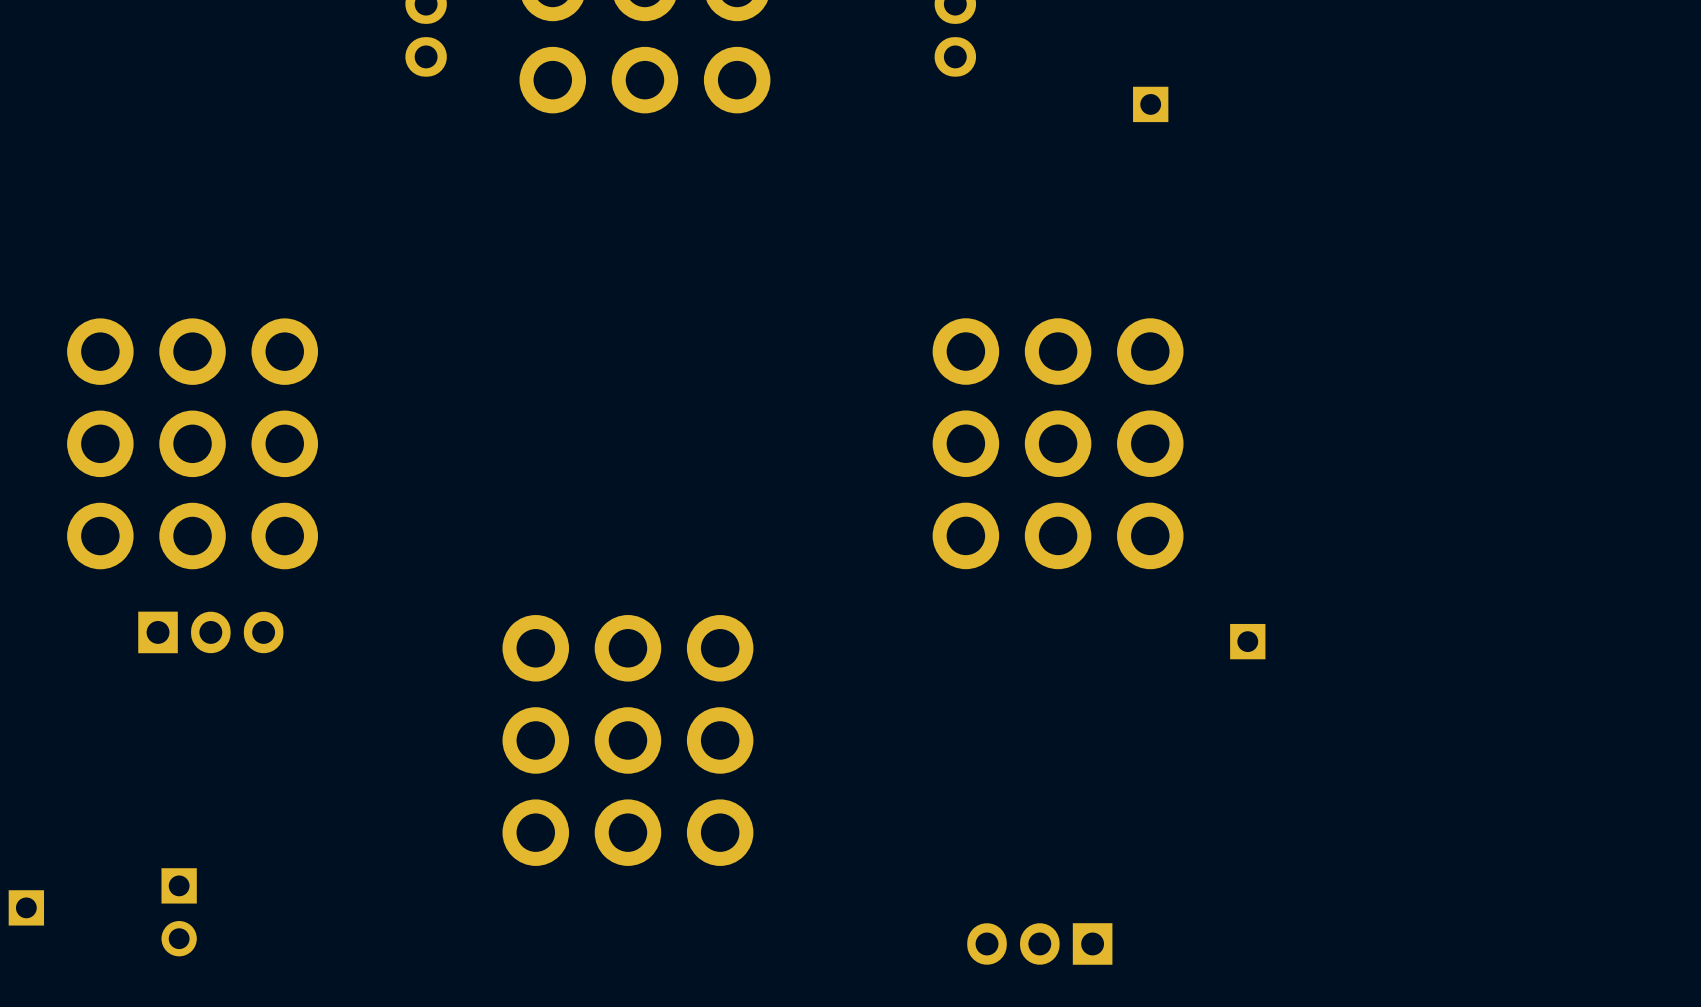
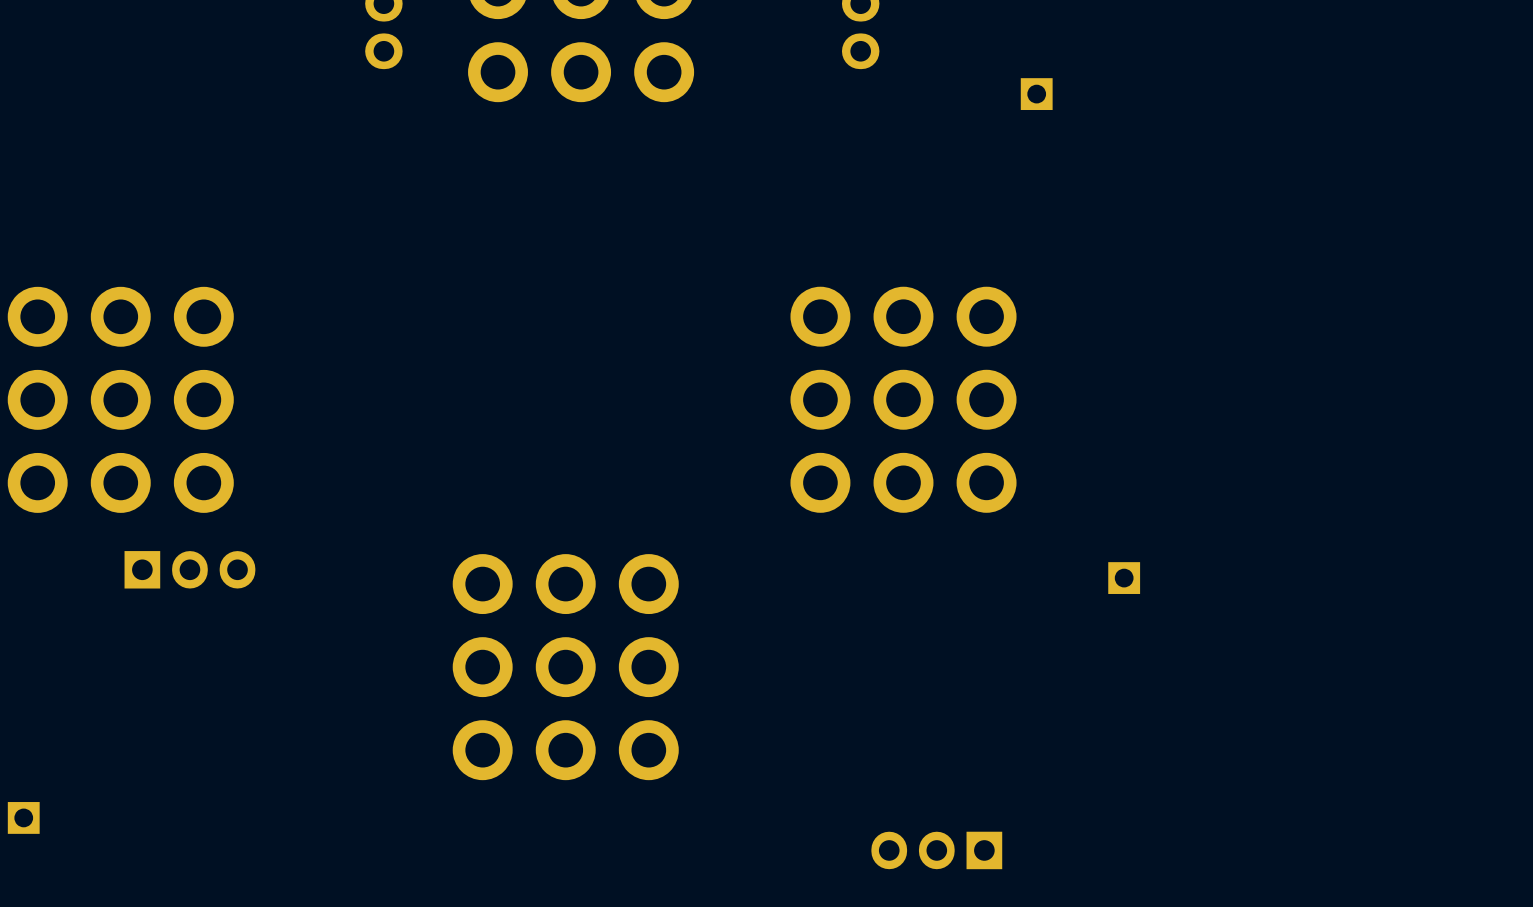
part position: (192, 443) -> (120, 399)
part position: (1058, 443) -> (903, 399)
part: (179, 912) -> none

